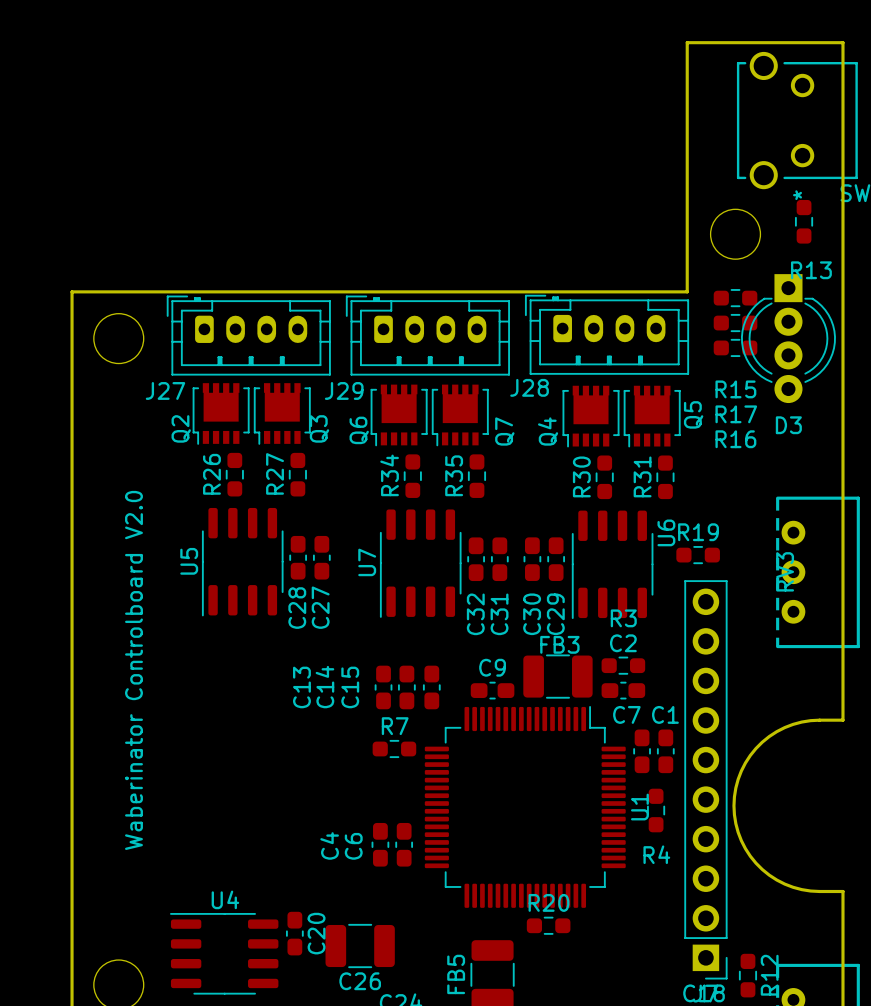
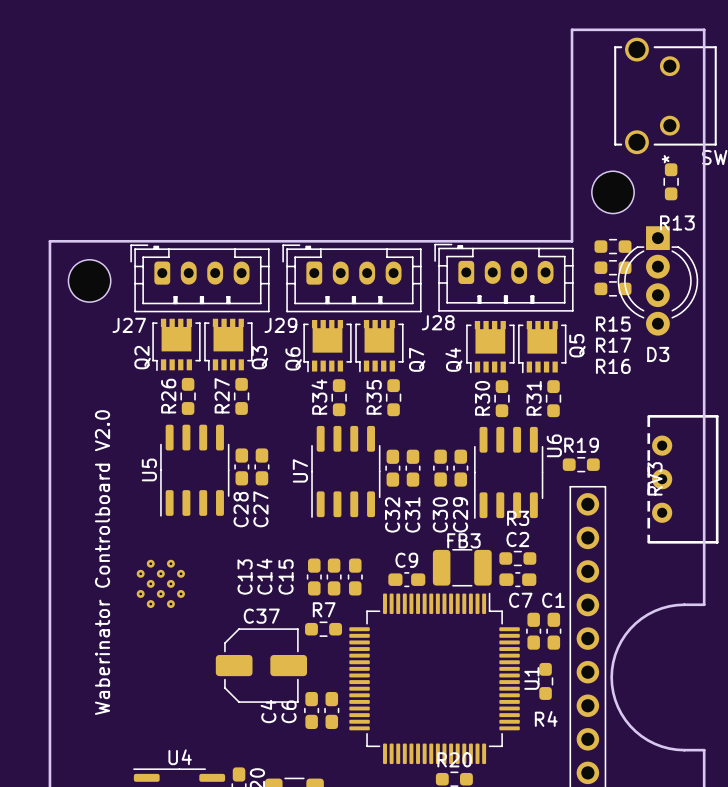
part: none -> (160, 583)
C37: none -> (261, 665)

